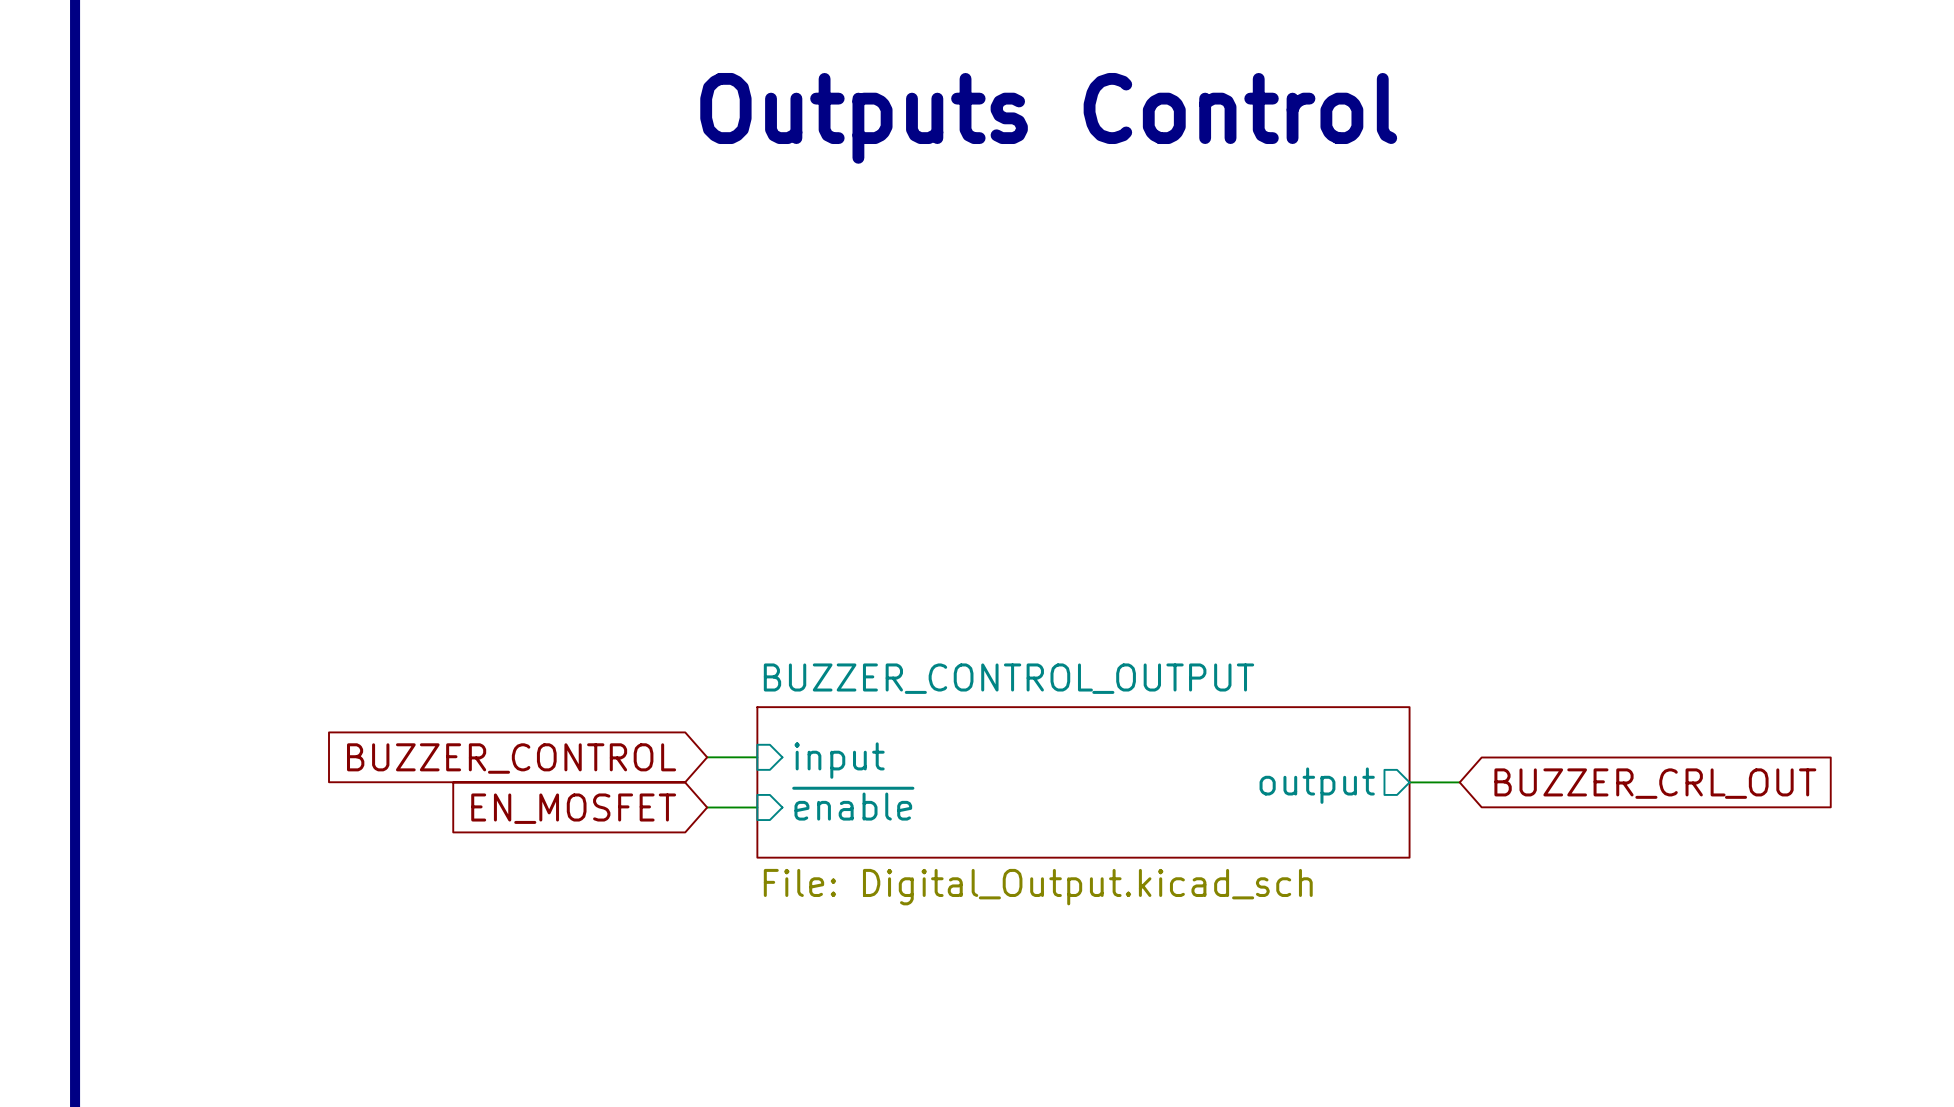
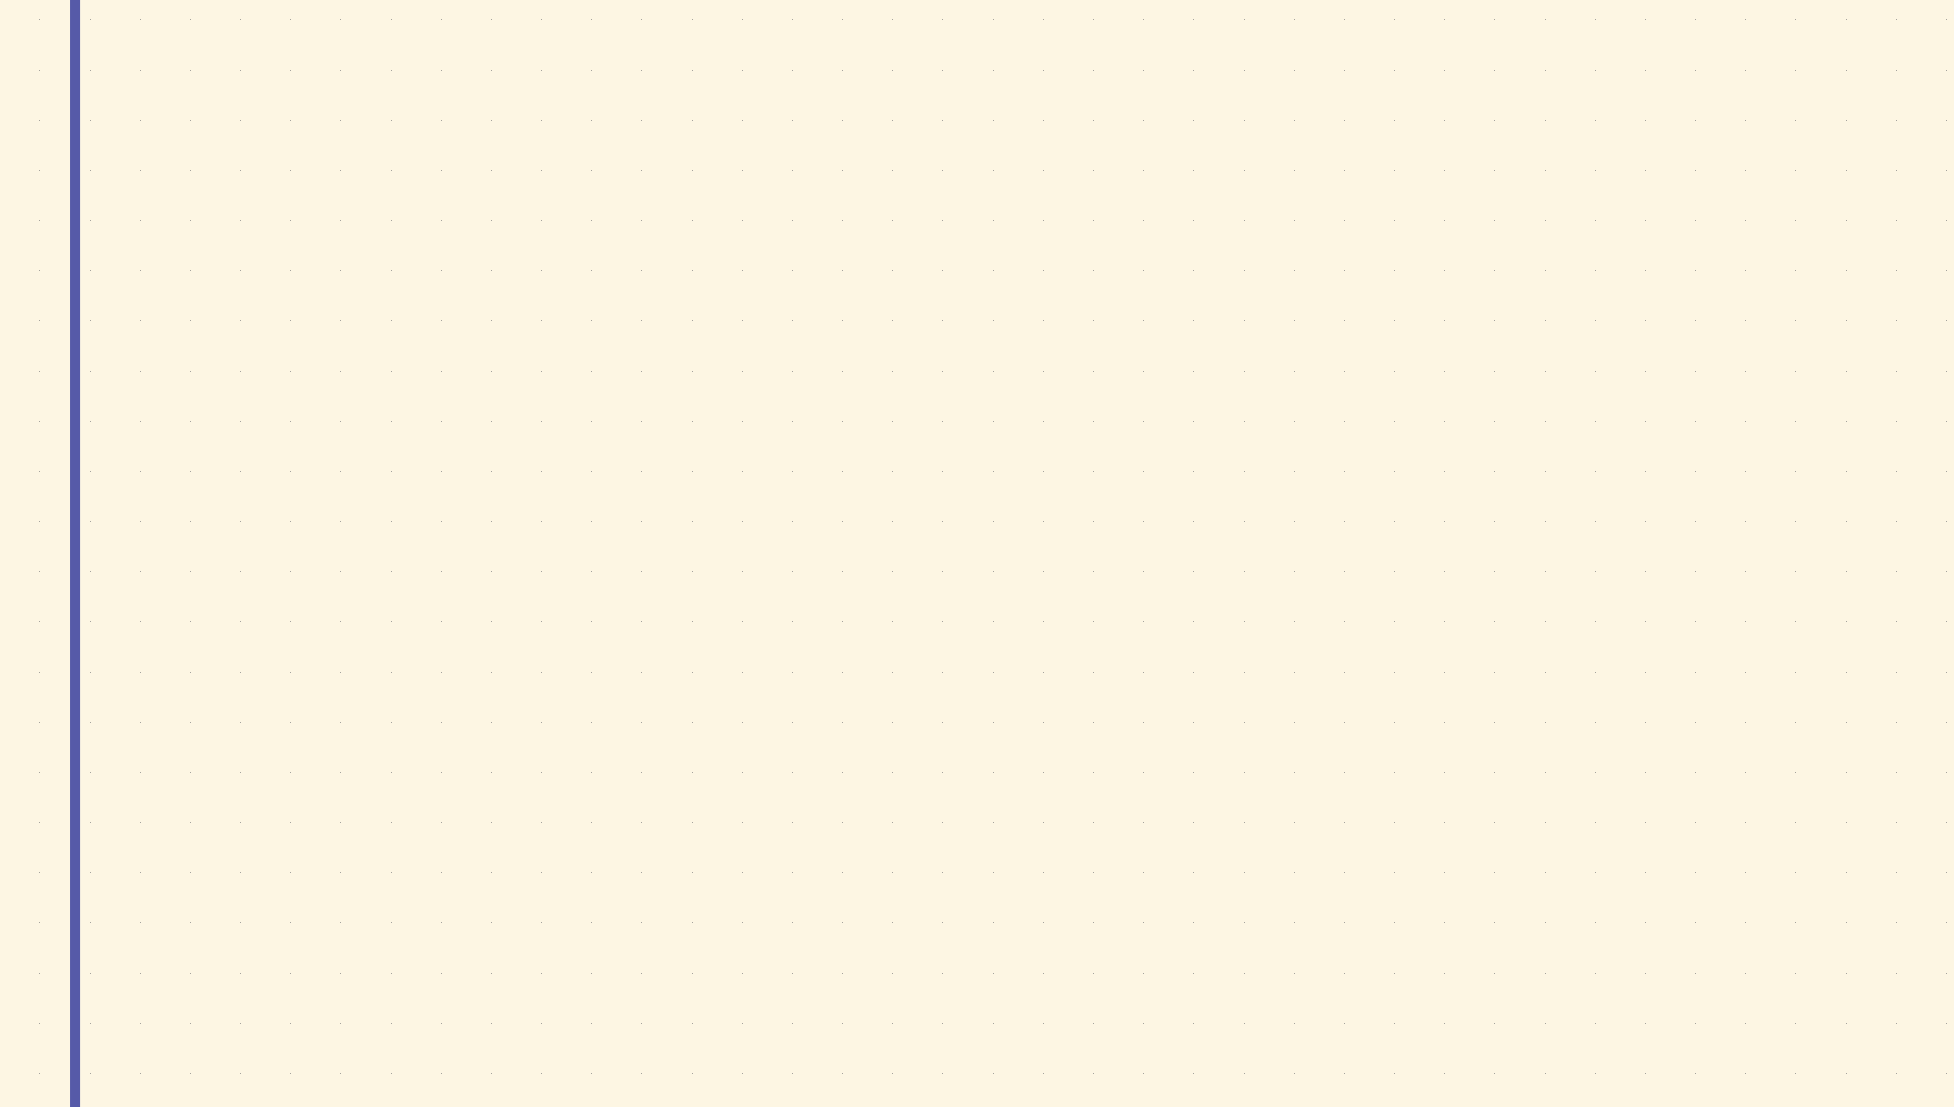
text: Outputs Control (1048, 118) -> none
wire: (707, 757) (757, 757) -> none
global label: BUZZER_CONTROL (511, 758) -> none
sheet pin: input (839, 760) -> none
sheet BUZZER_CONTROL_OUTPUT: File: Digital_Output.kicad_sch (1083, 782) -> none
wire: (1409, 782) (1459, 782) -> none
global label: BUZZER_CRL_OUT (1655, 783) -> none
sheet pin: output (1317, 785) -> none
sheet pin: ~{enable} (853, 803) -> none
wire: (707, 807) (757, 807) -> none
global label: EN_MOSFET (573, 808) -> none

